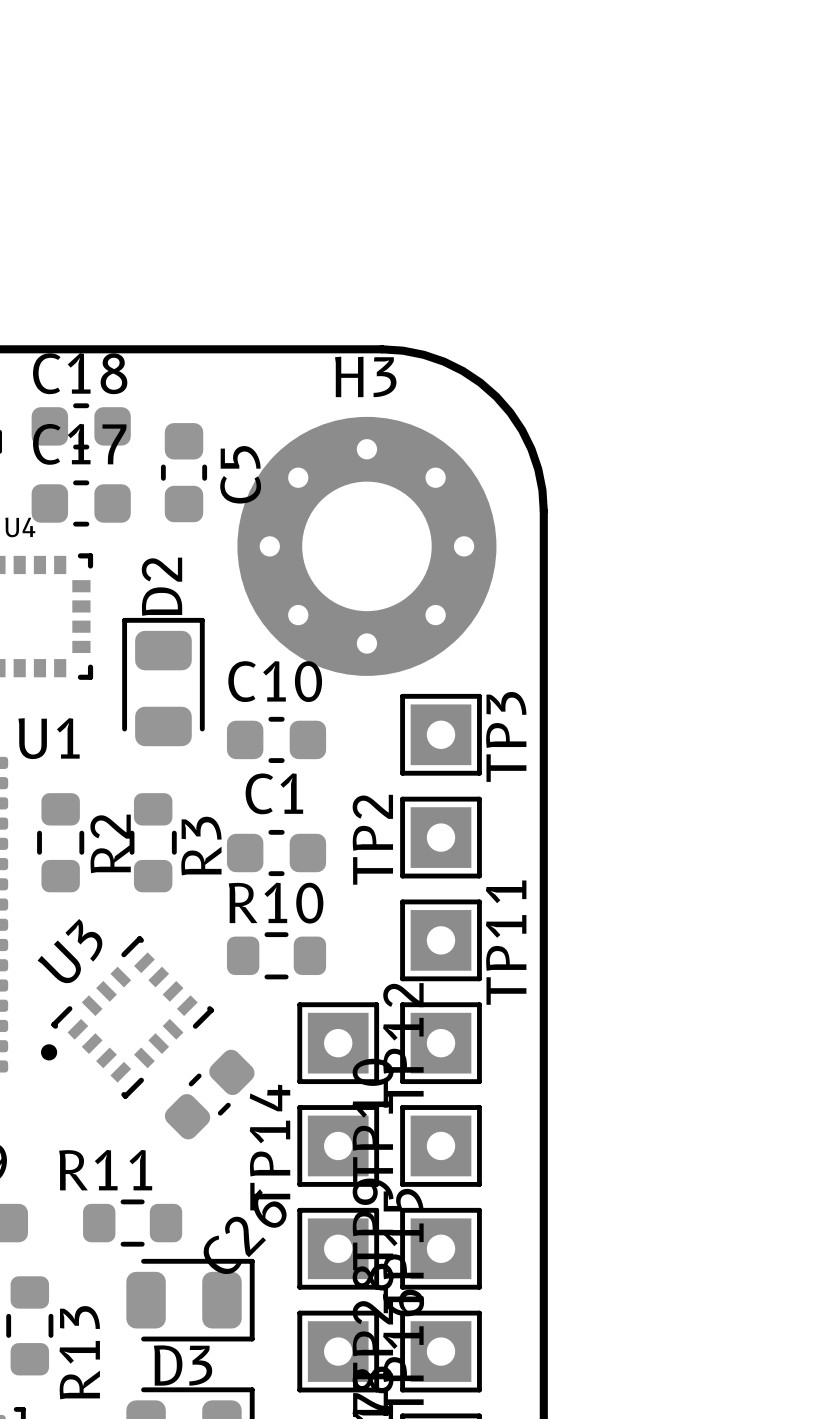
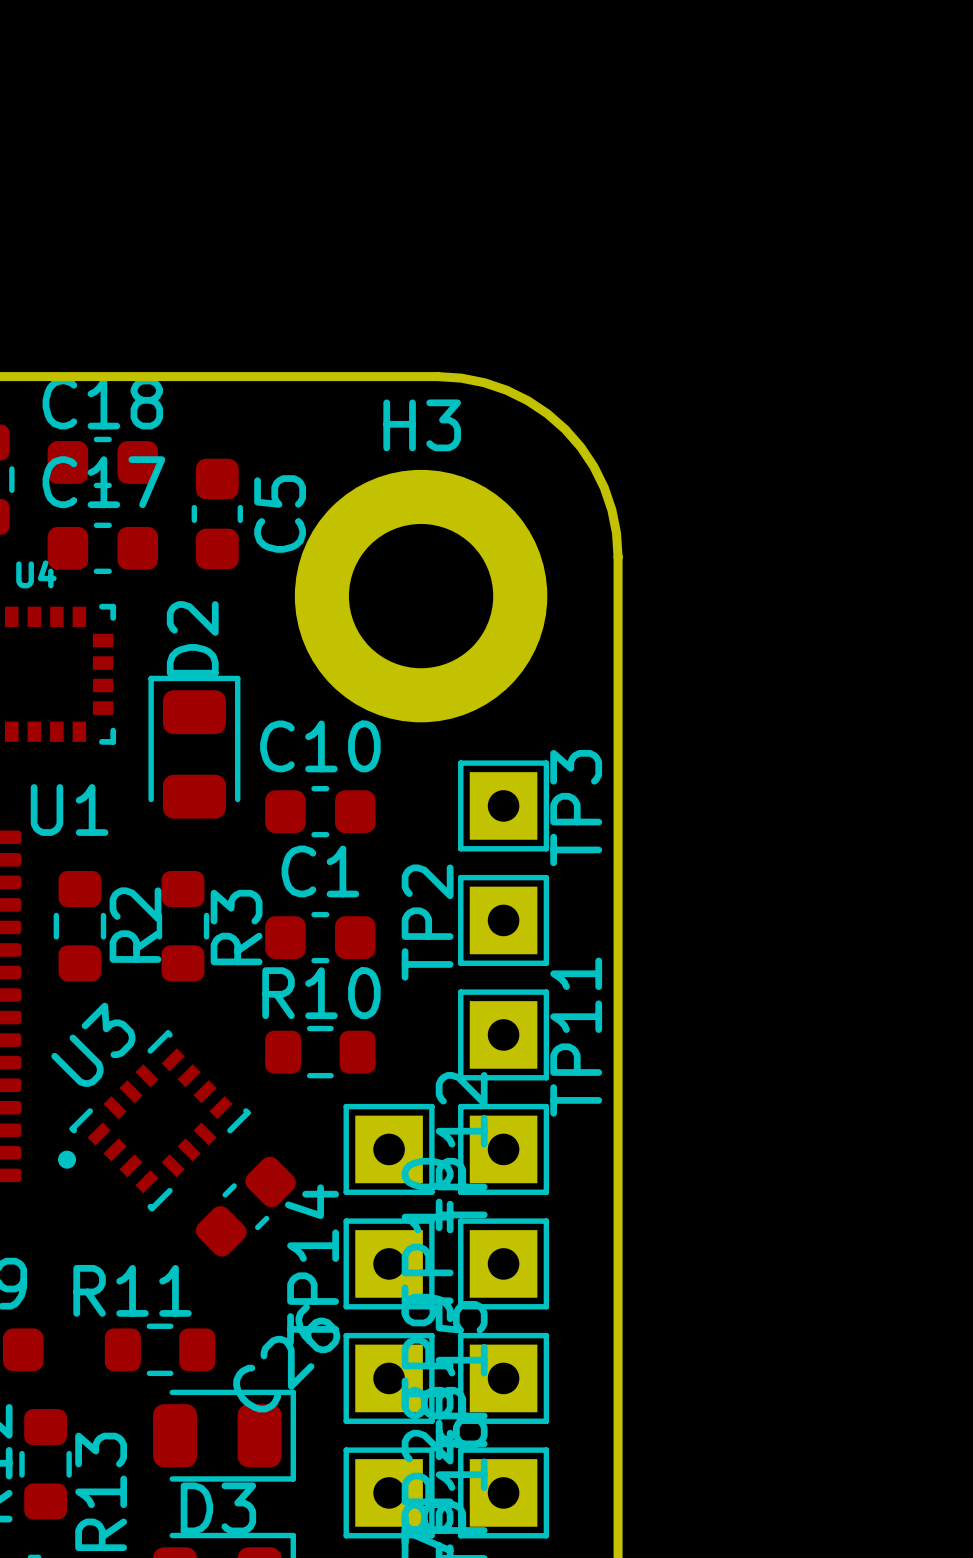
H3 footprint: [237, 416, 497, 676] -> [294, 469, 548, 723]

